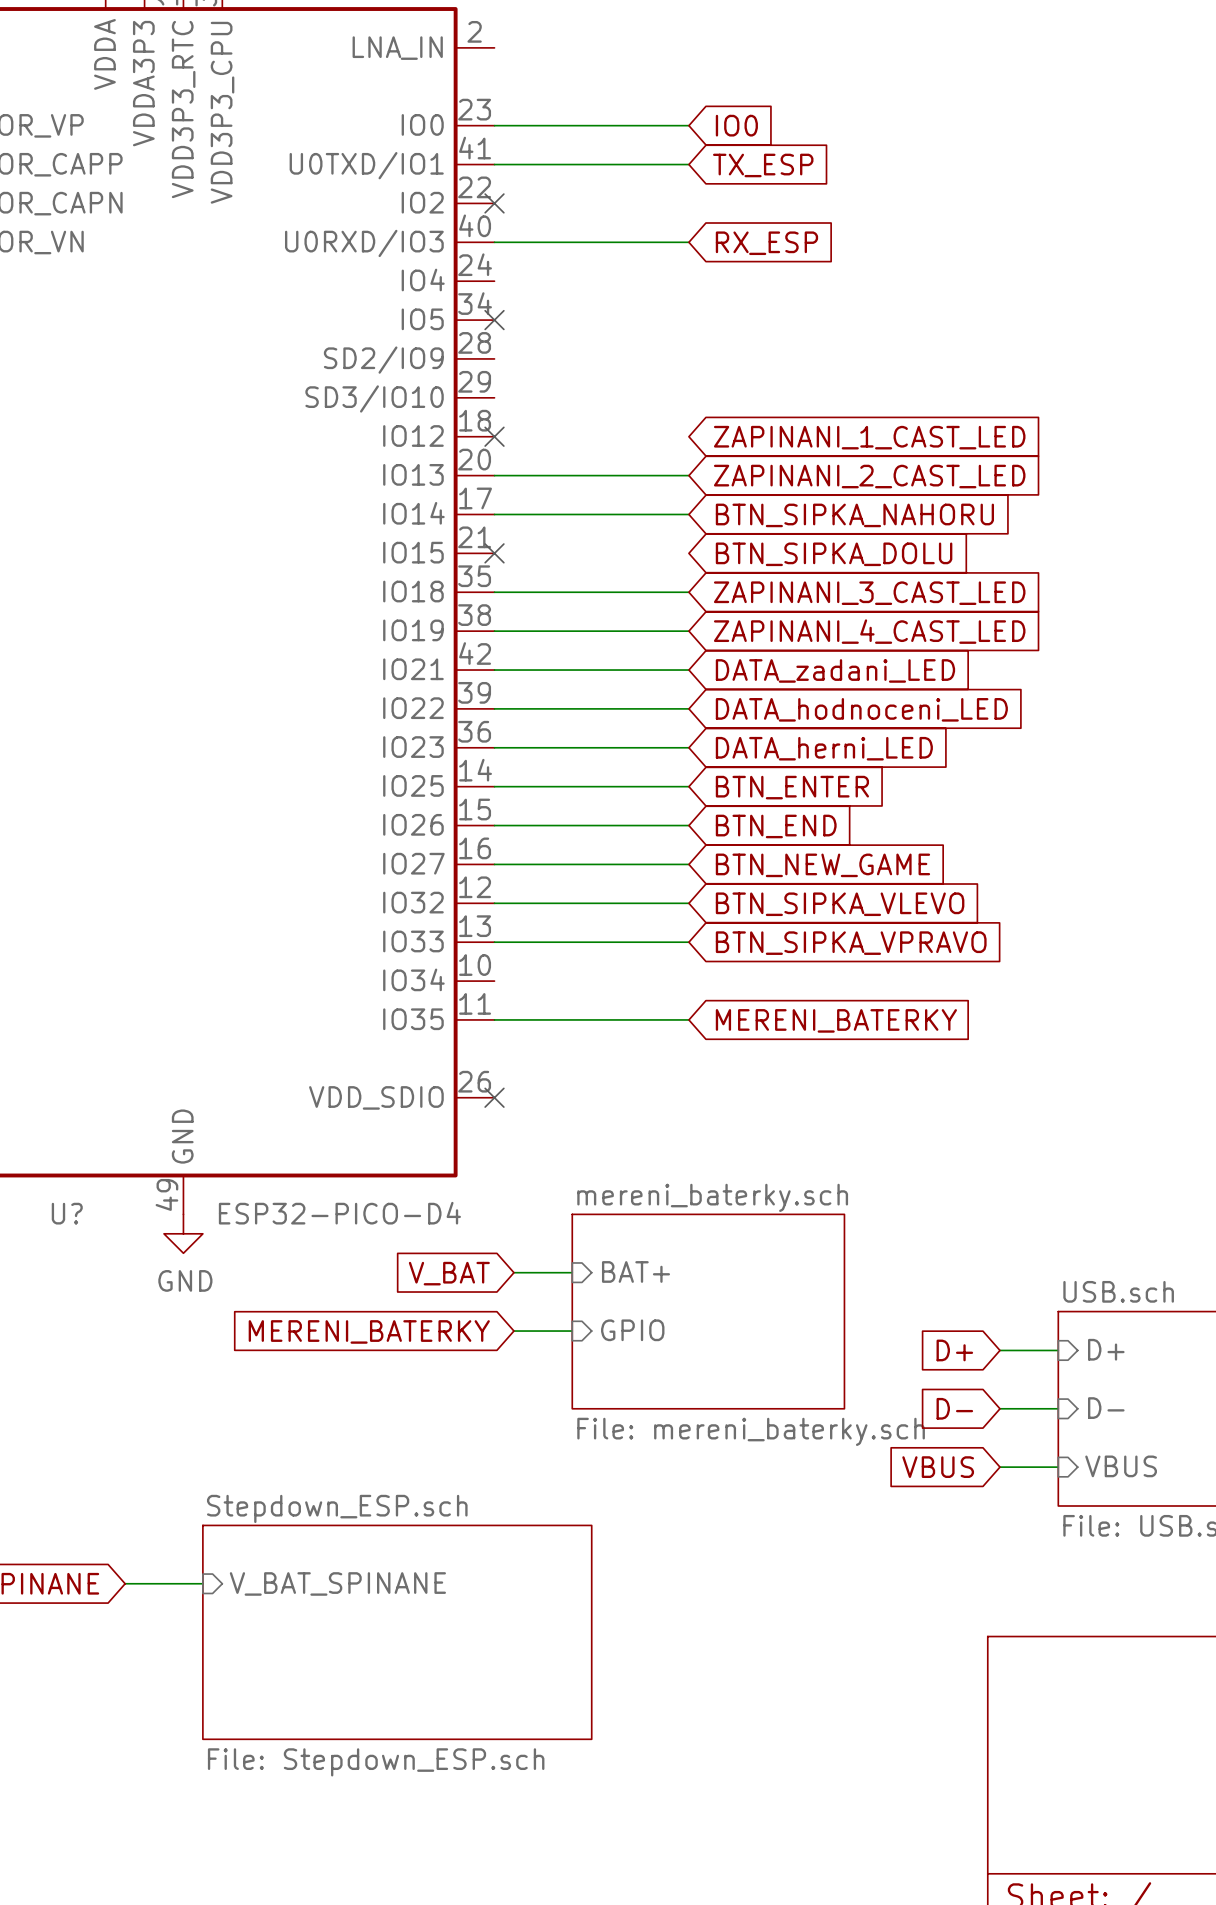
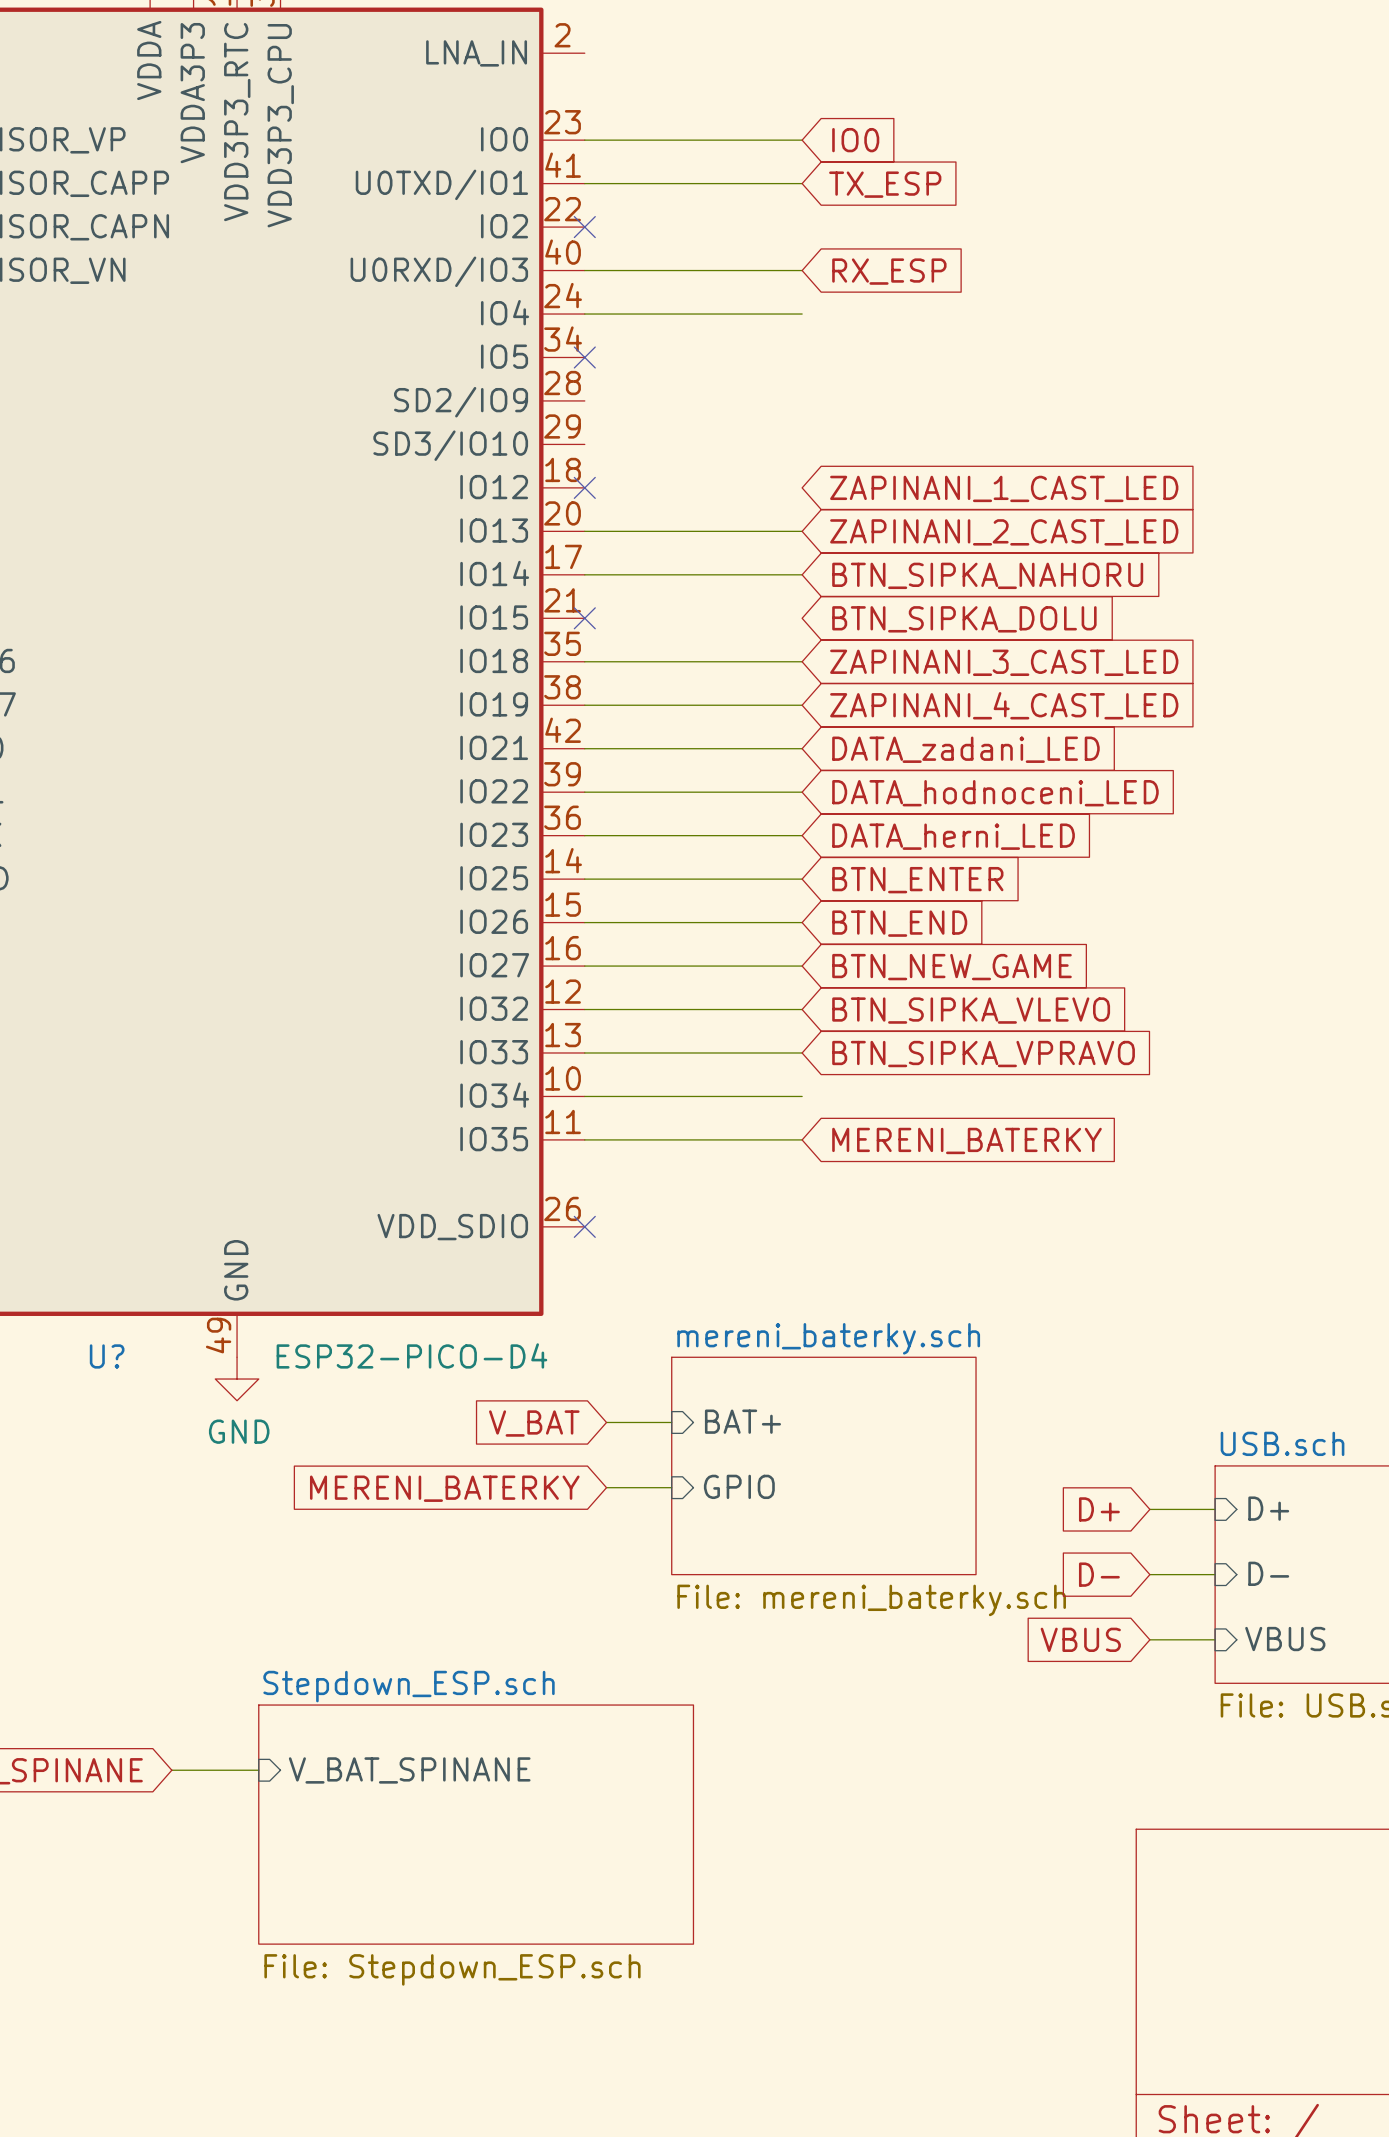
wire: none -> (584, 314) (802, 314)
wire: none -> (584, 1096) (802, 1096)

